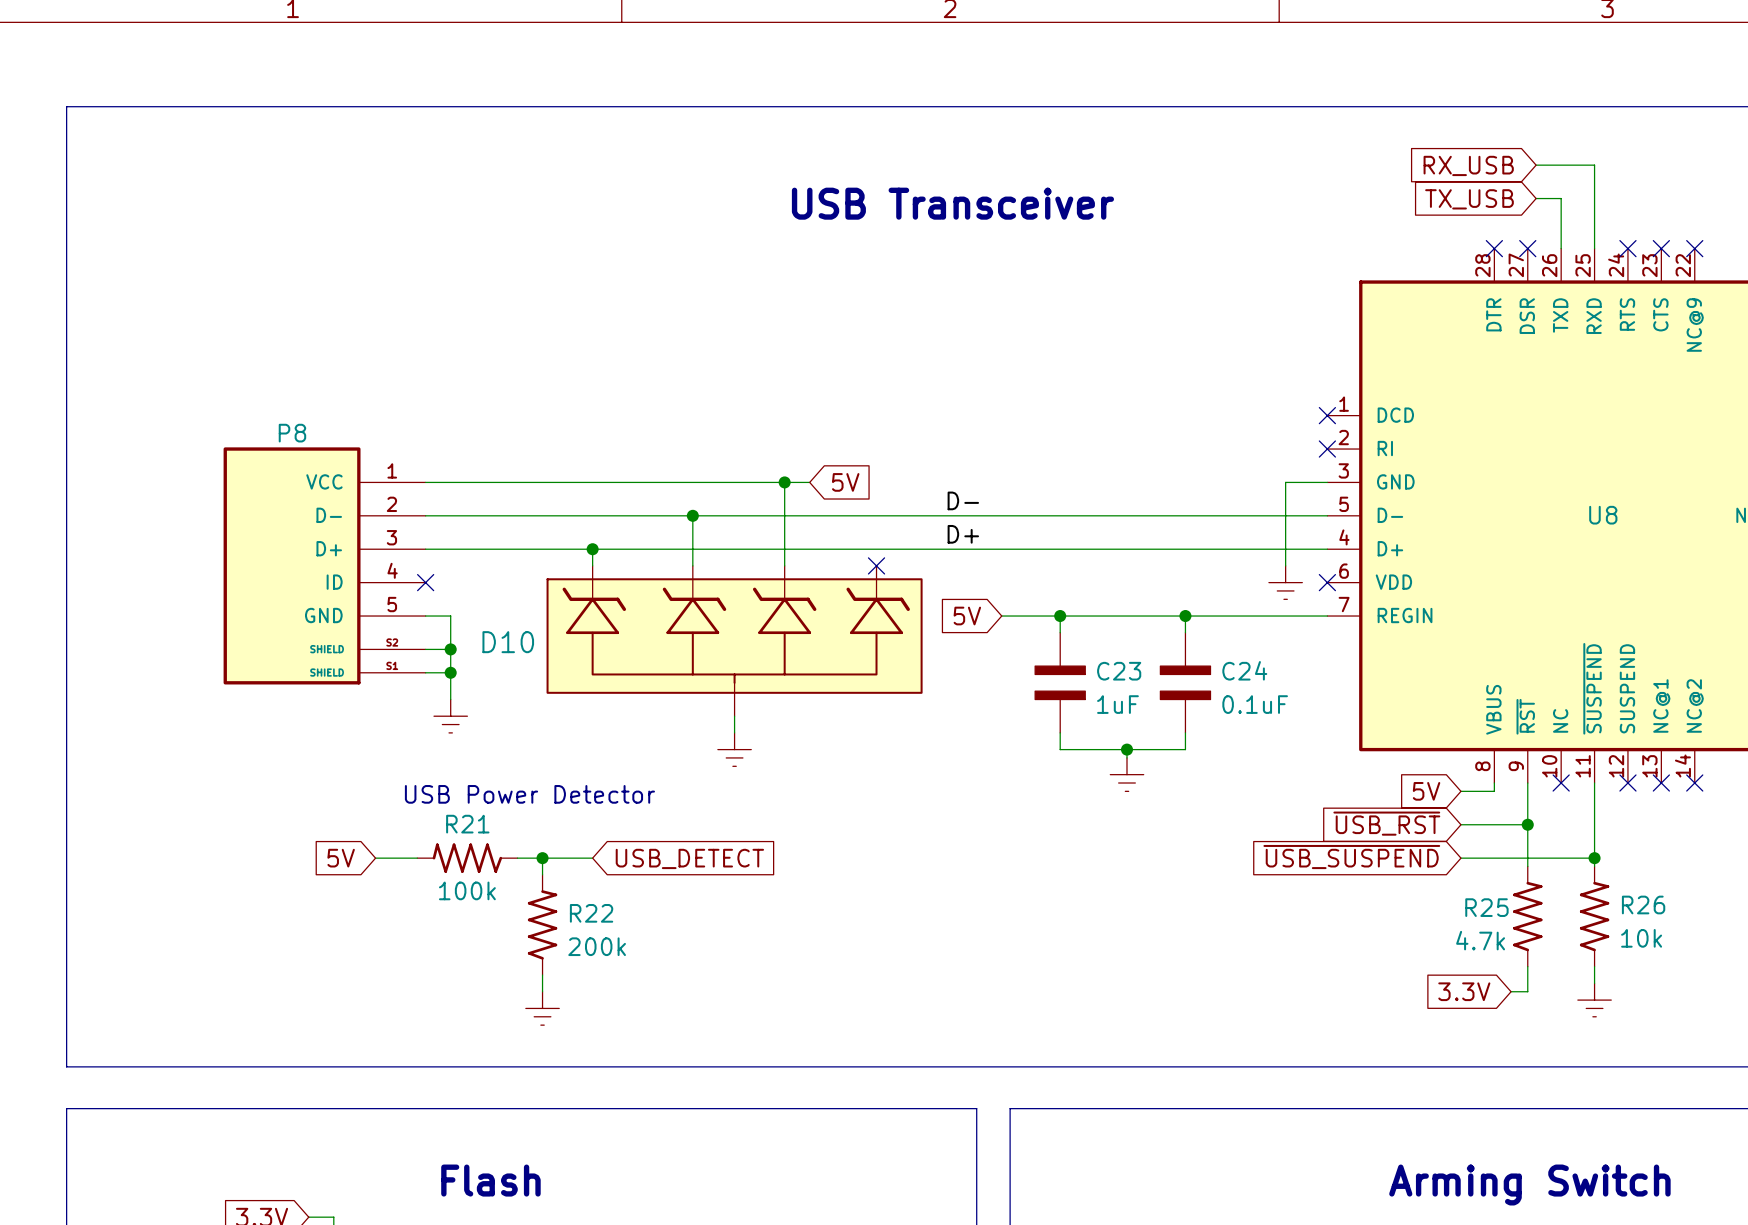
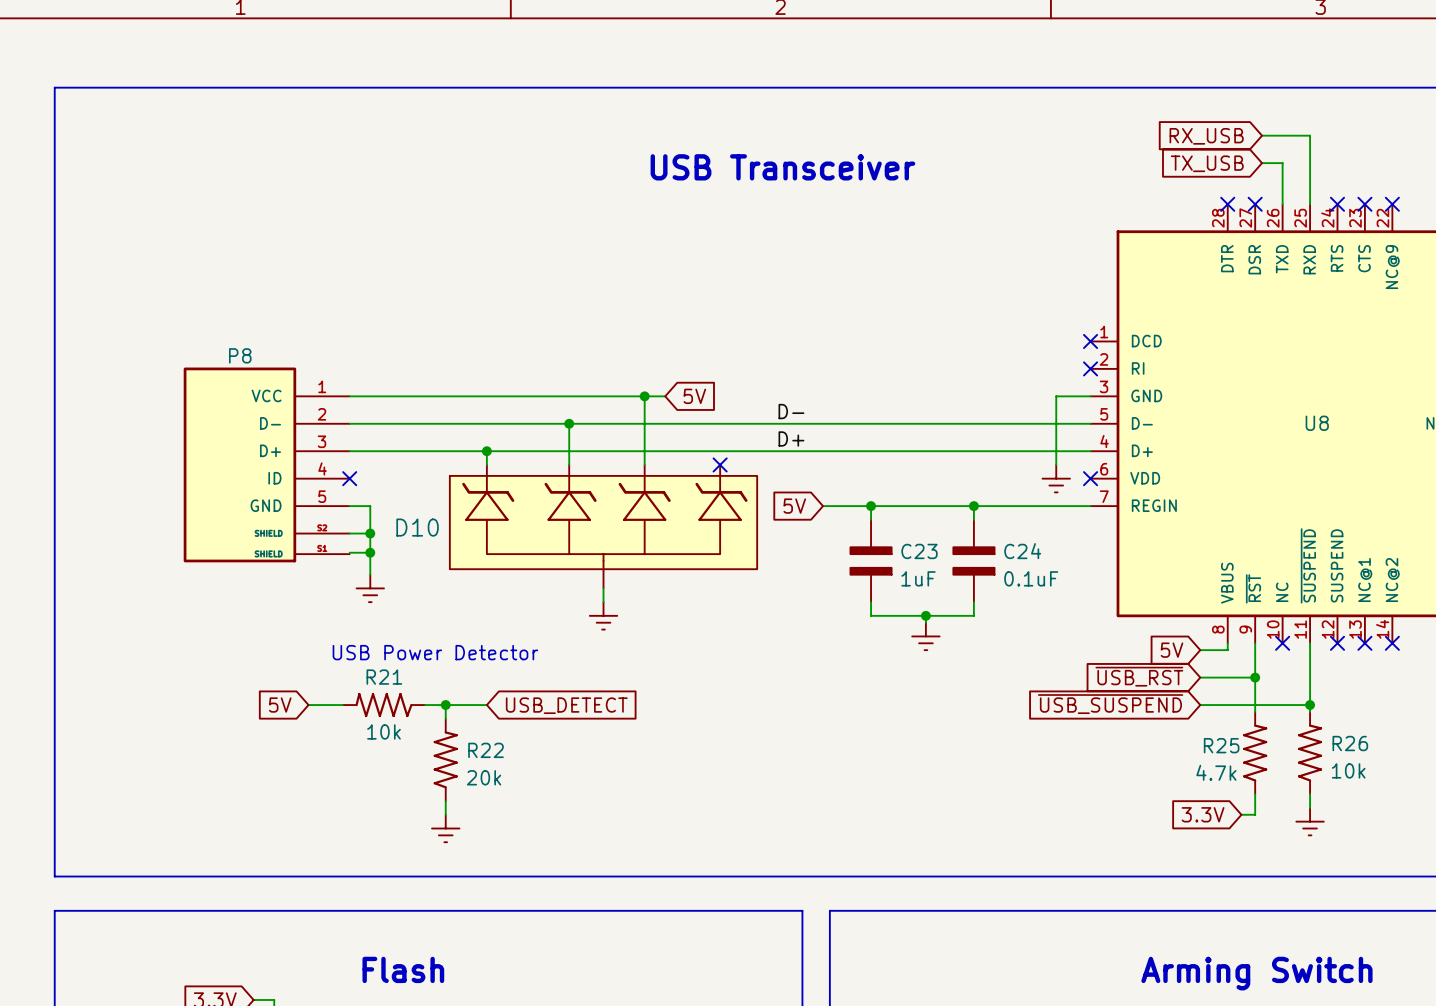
P8 symbol: [223, 447, 426, 685] -> [183, 367, 350, 563]
R21 value: 100k (467, 890) -> 10k (384, 731)
R22 value: 200k (597, 946) -> 20k (484, 777)

